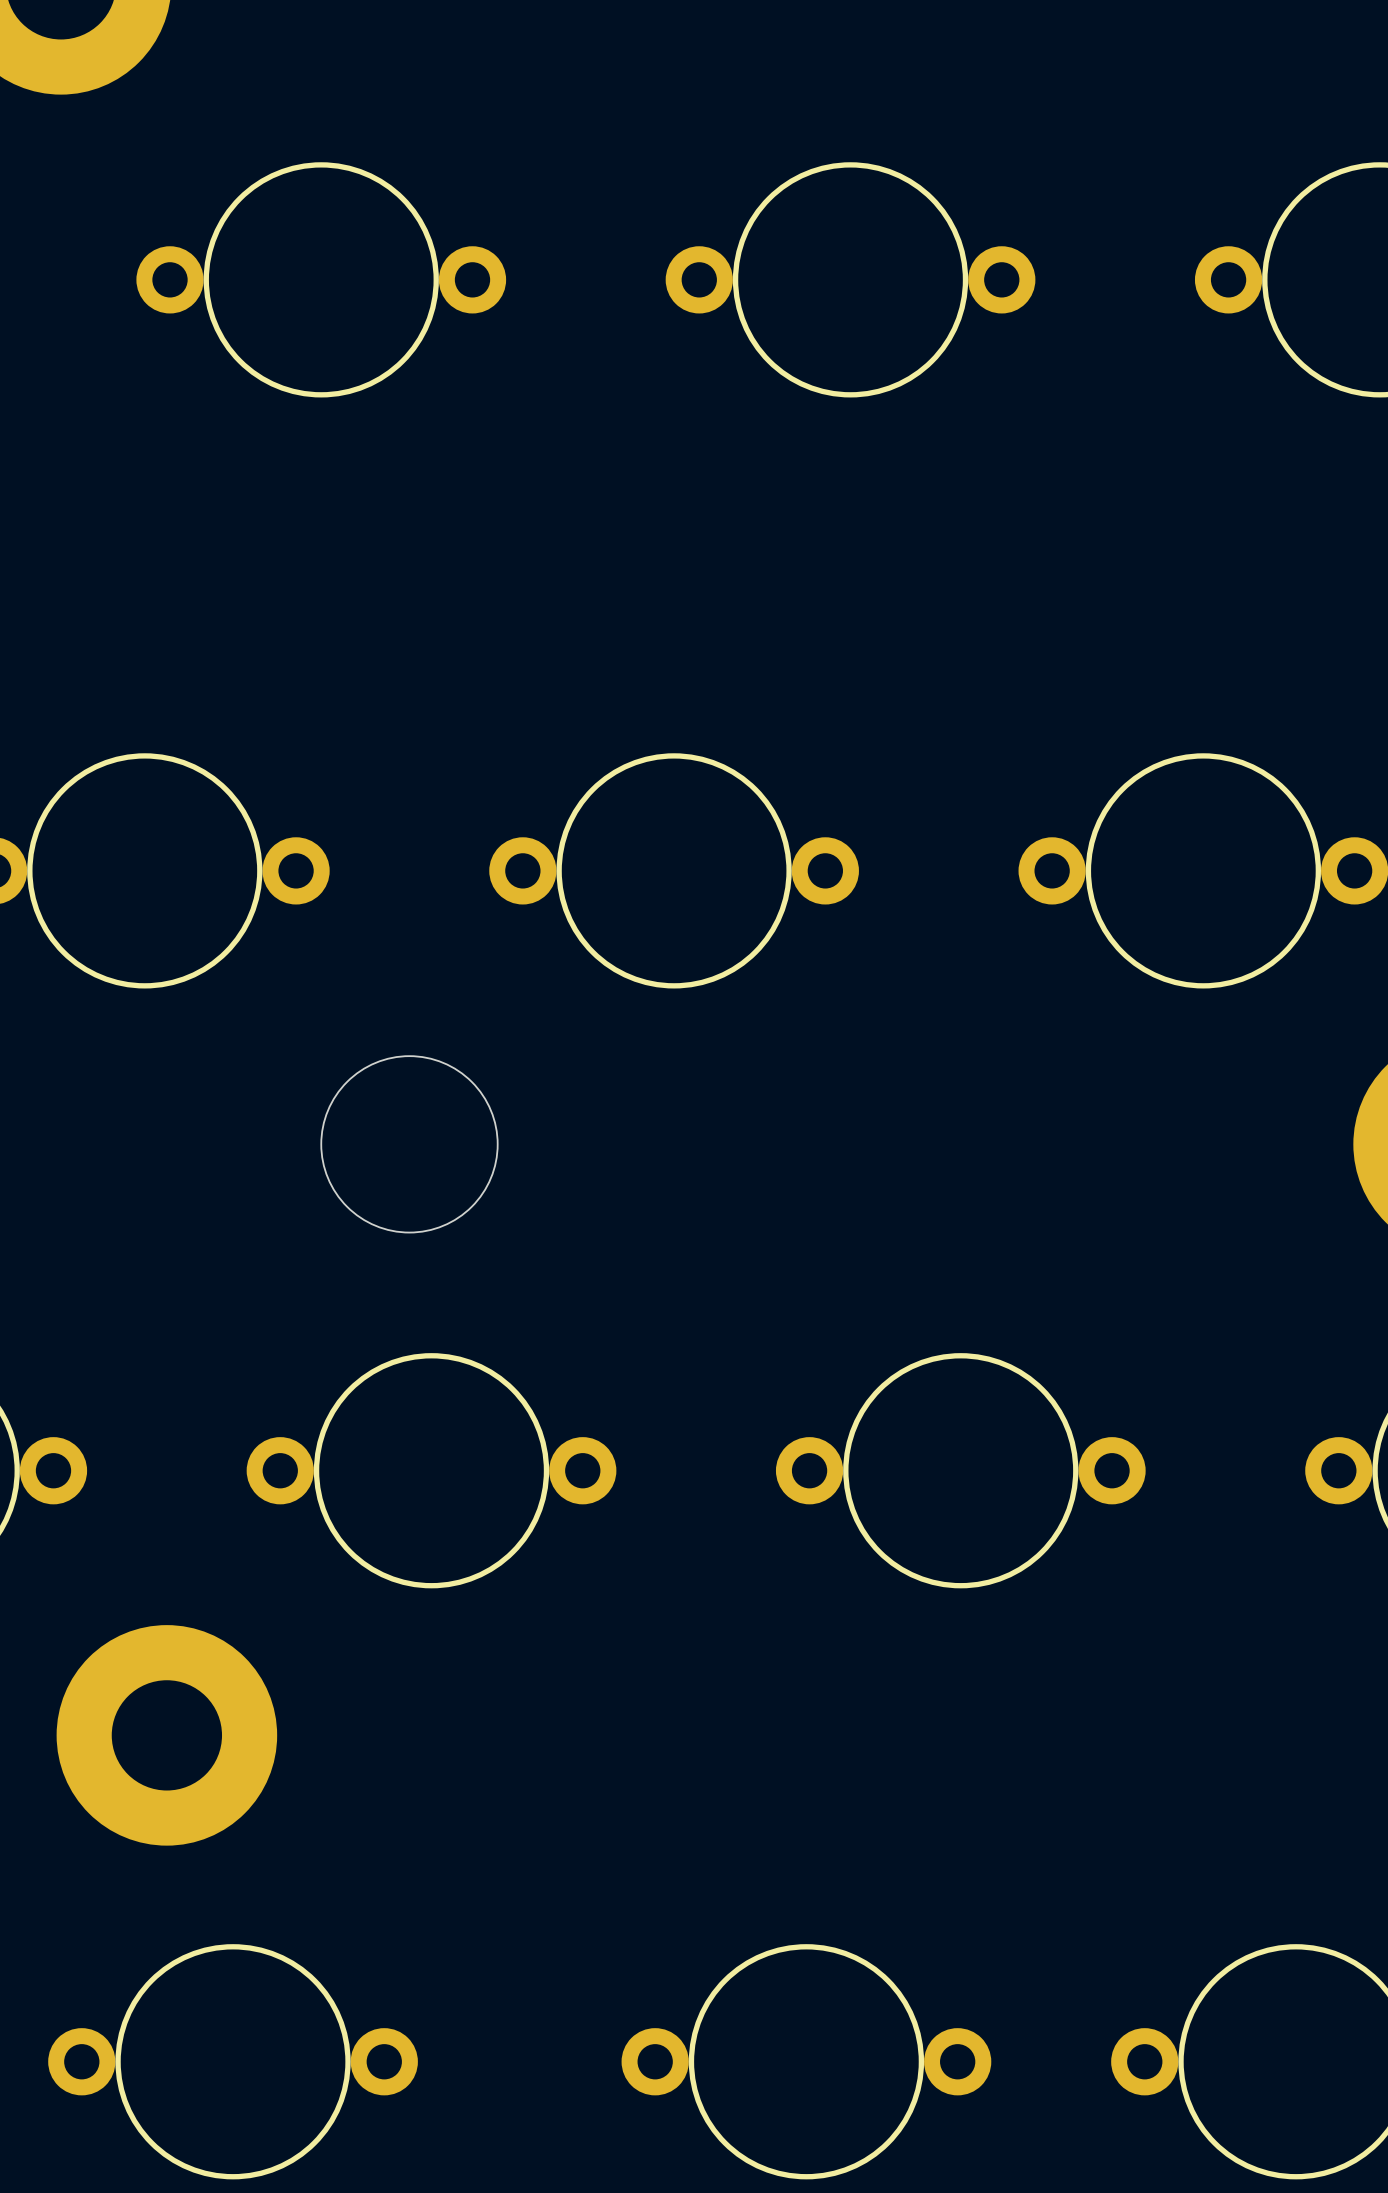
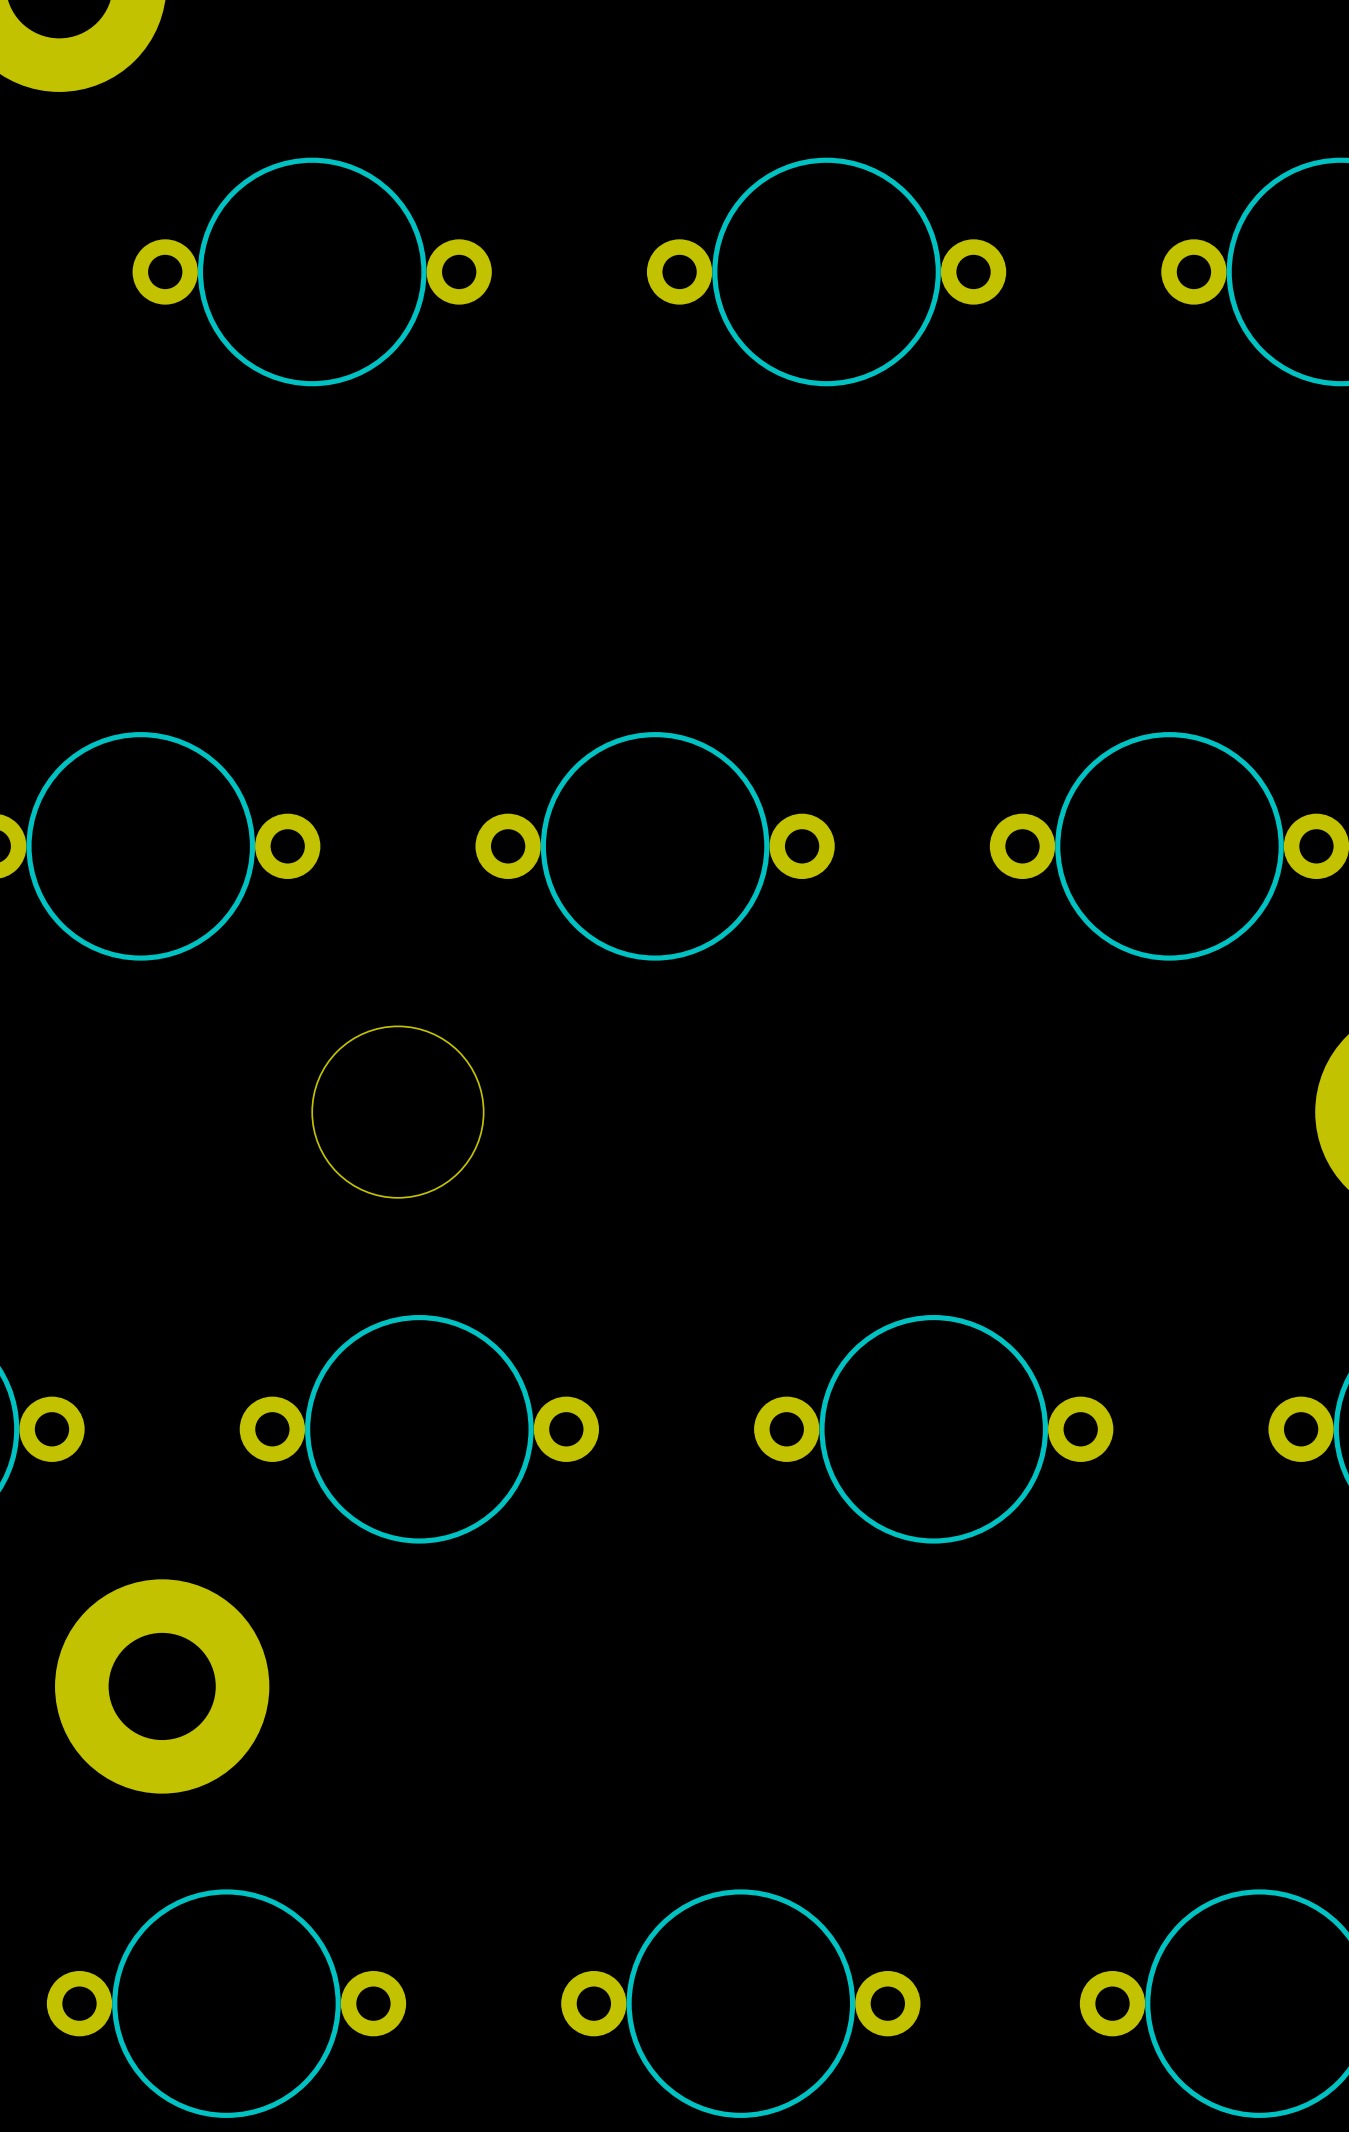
part position: (806, 2061) -> (740, 2003)

